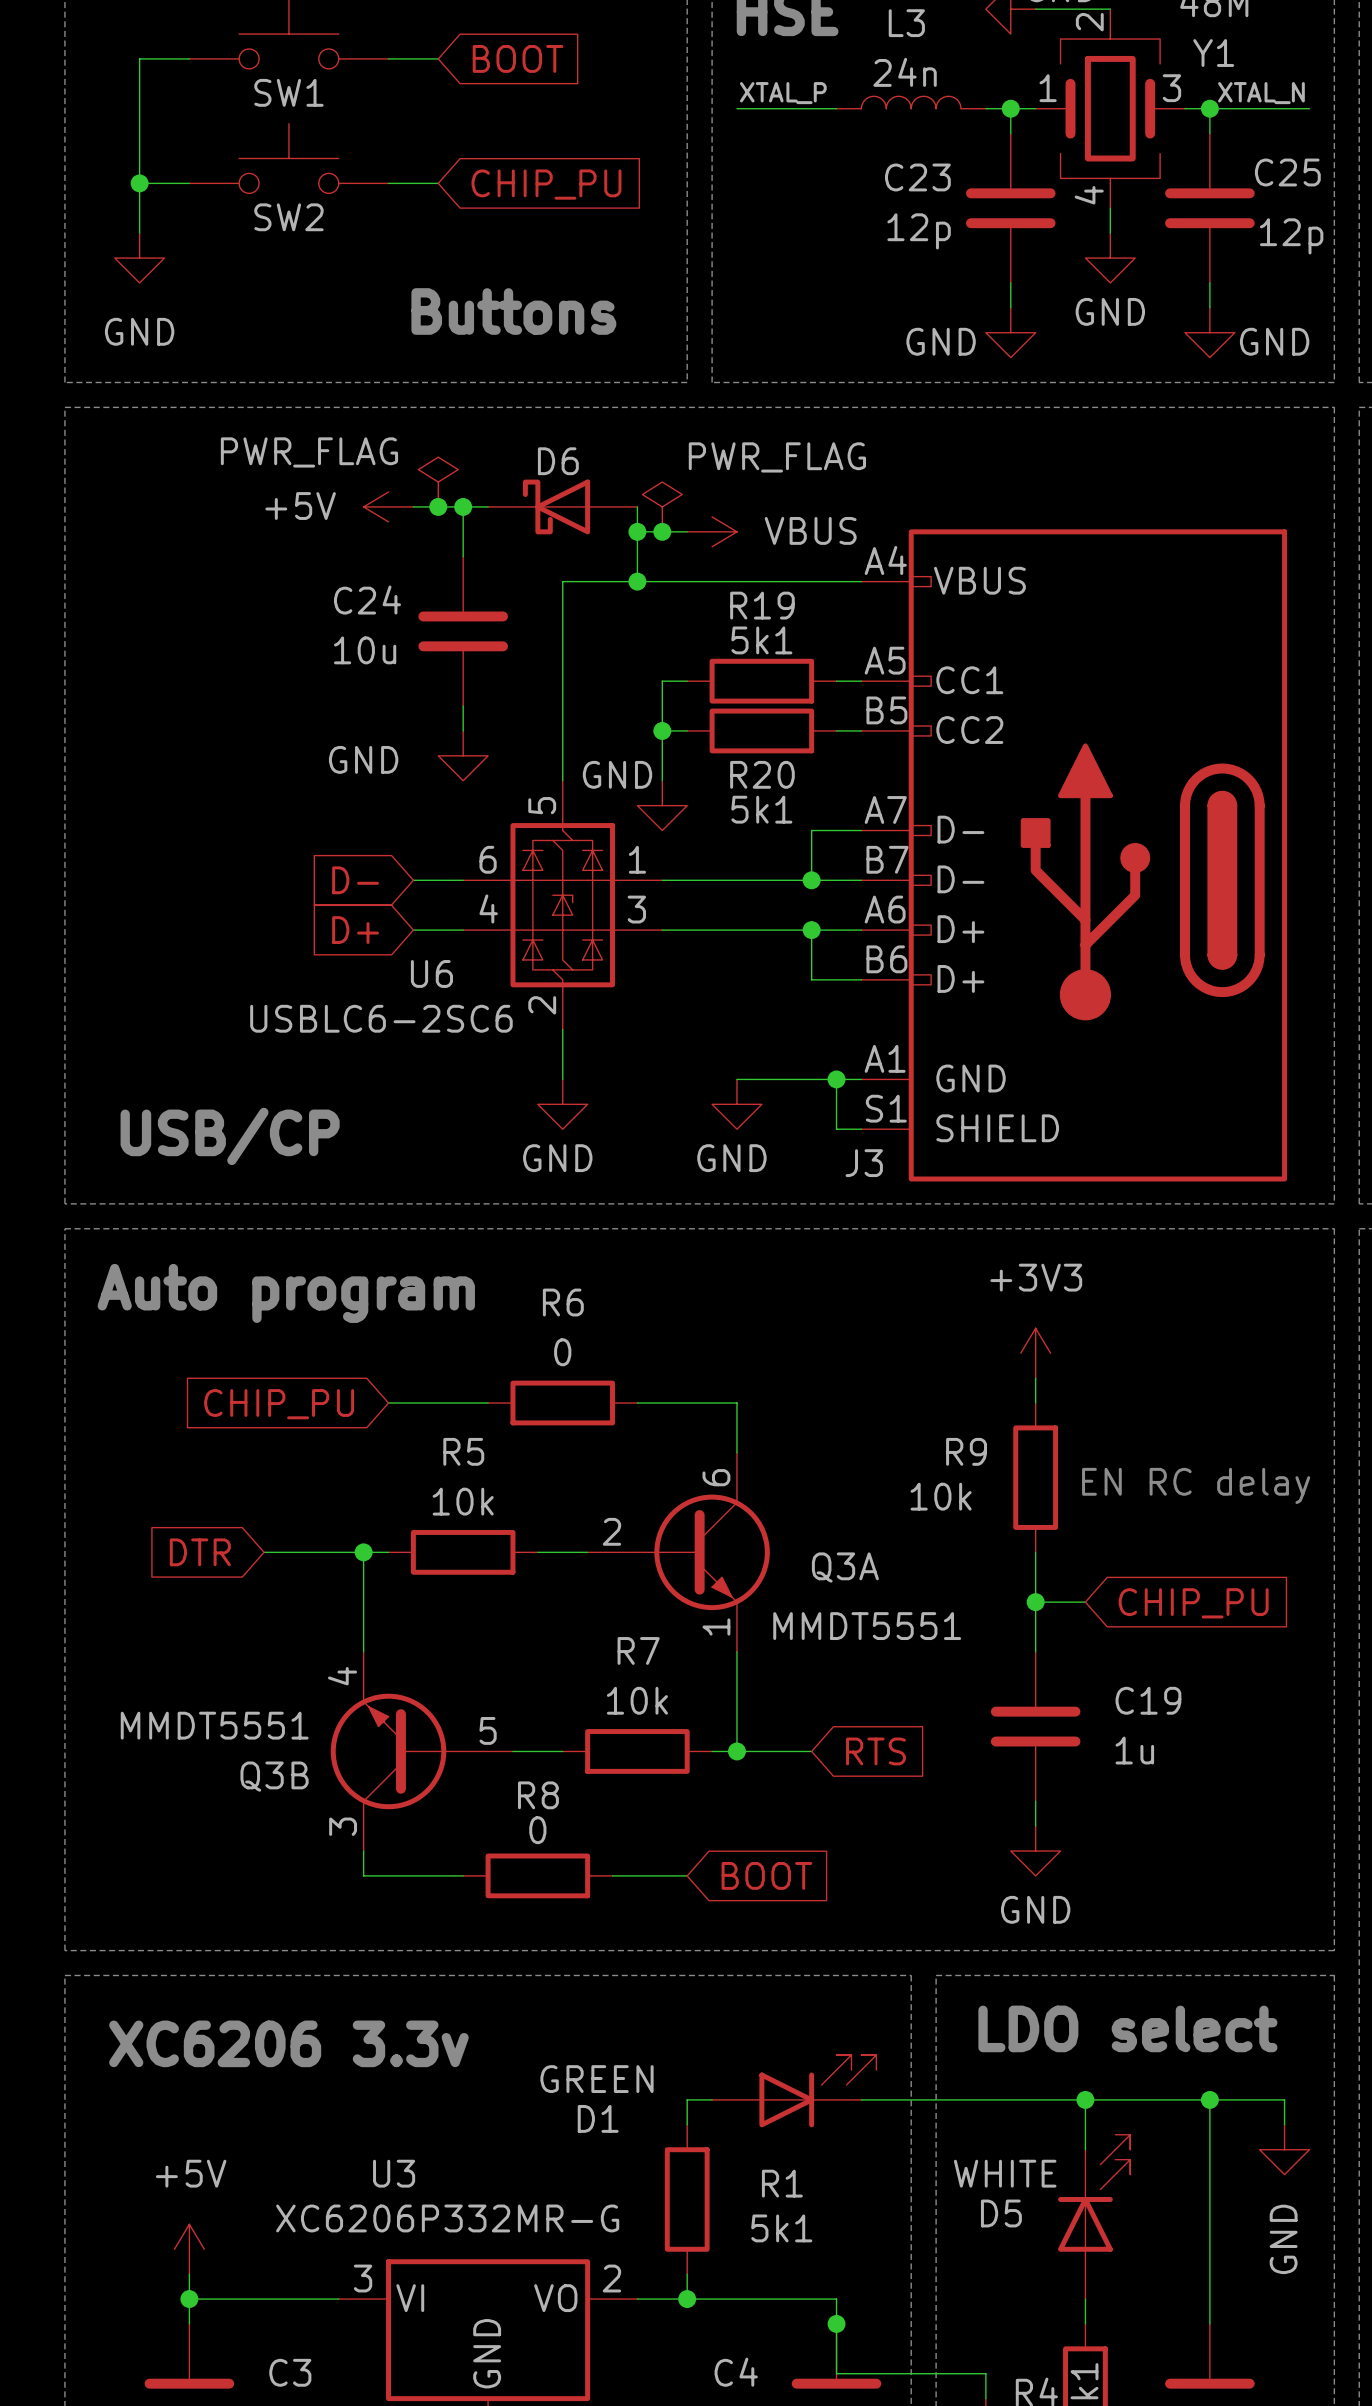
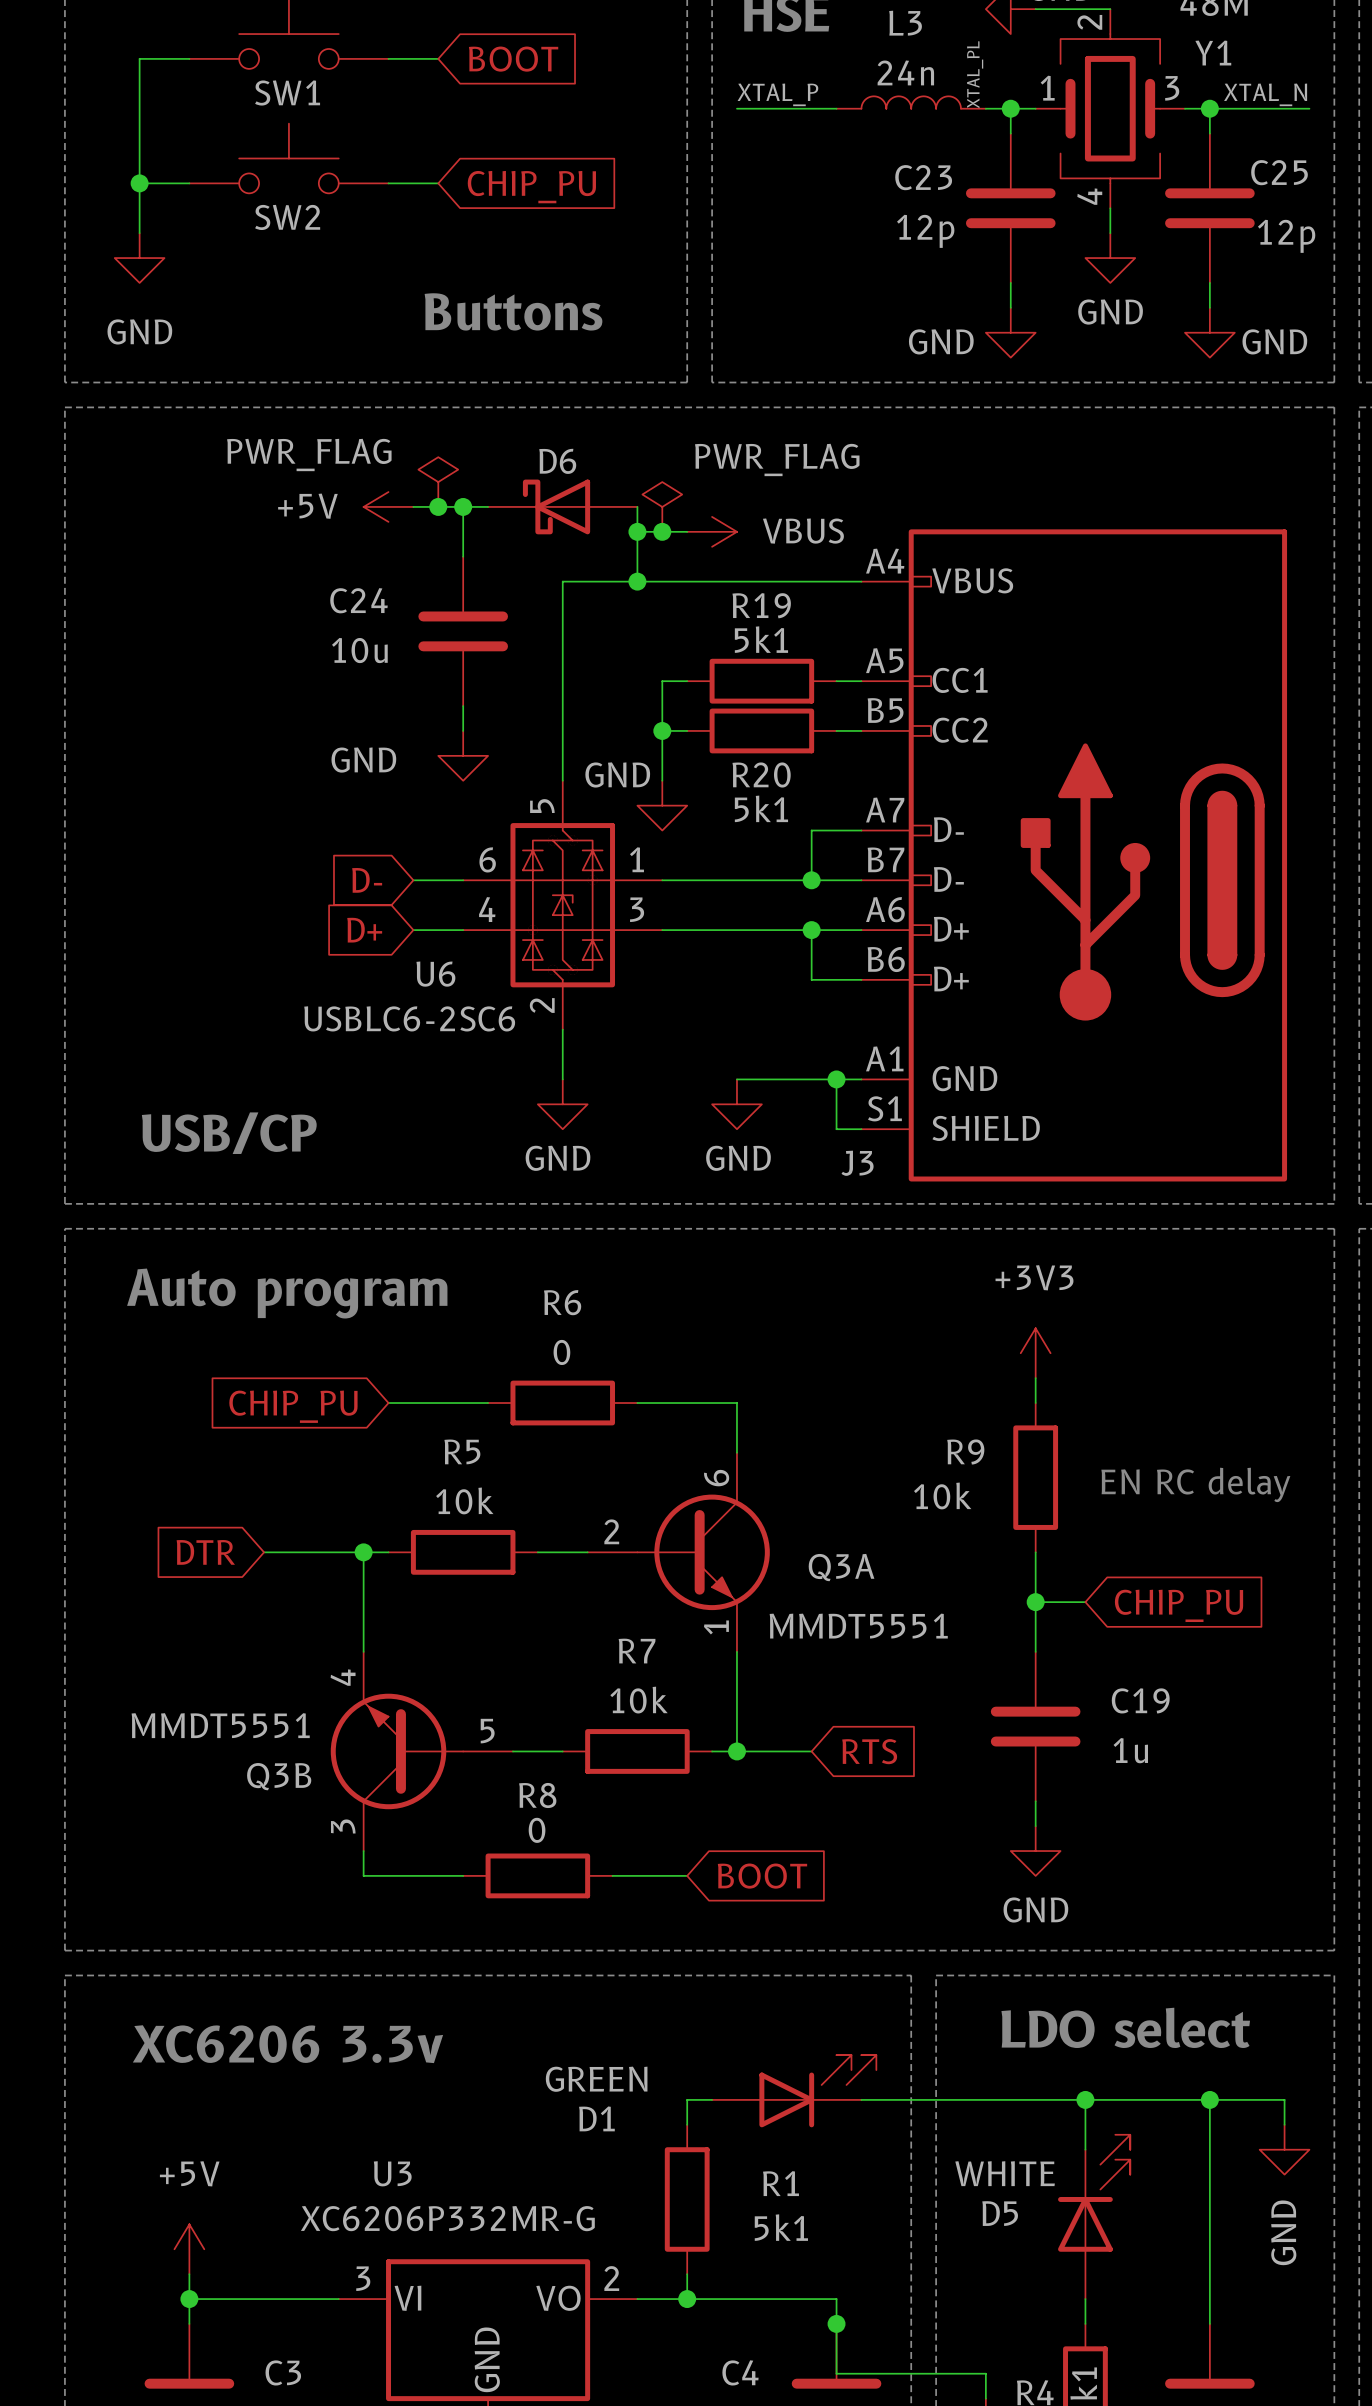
label: none -> XTAL_PL (975, 74)

